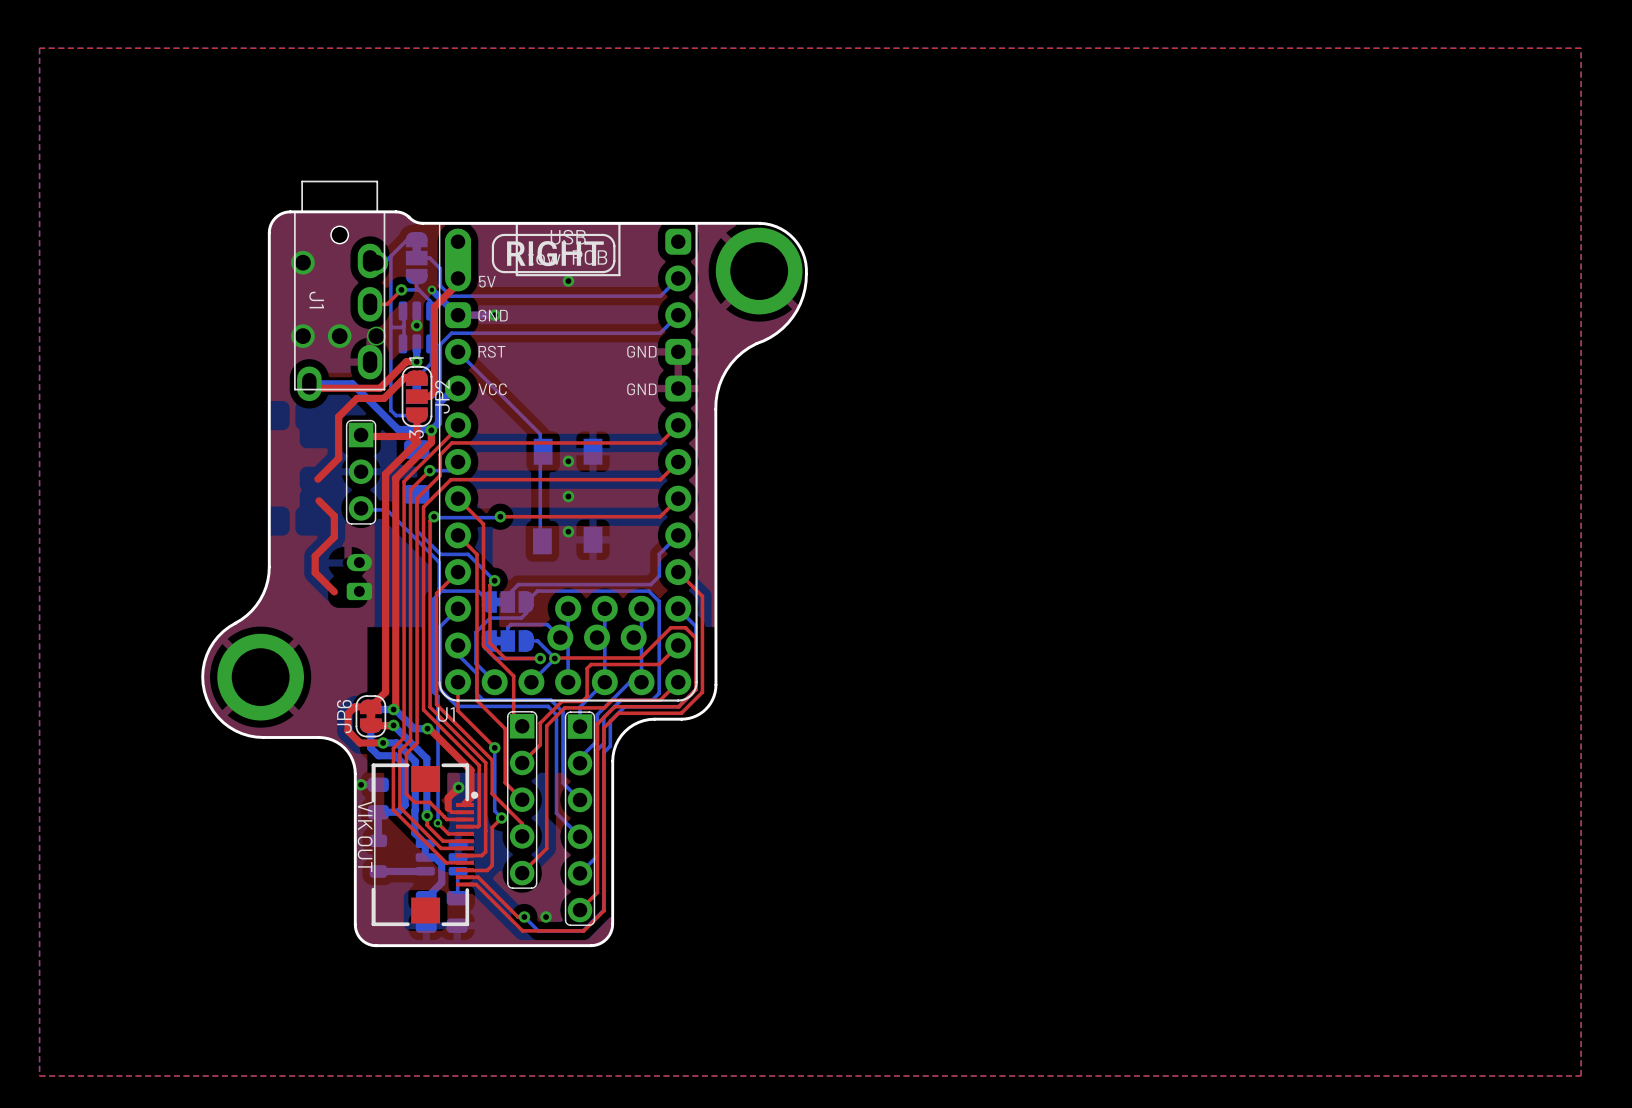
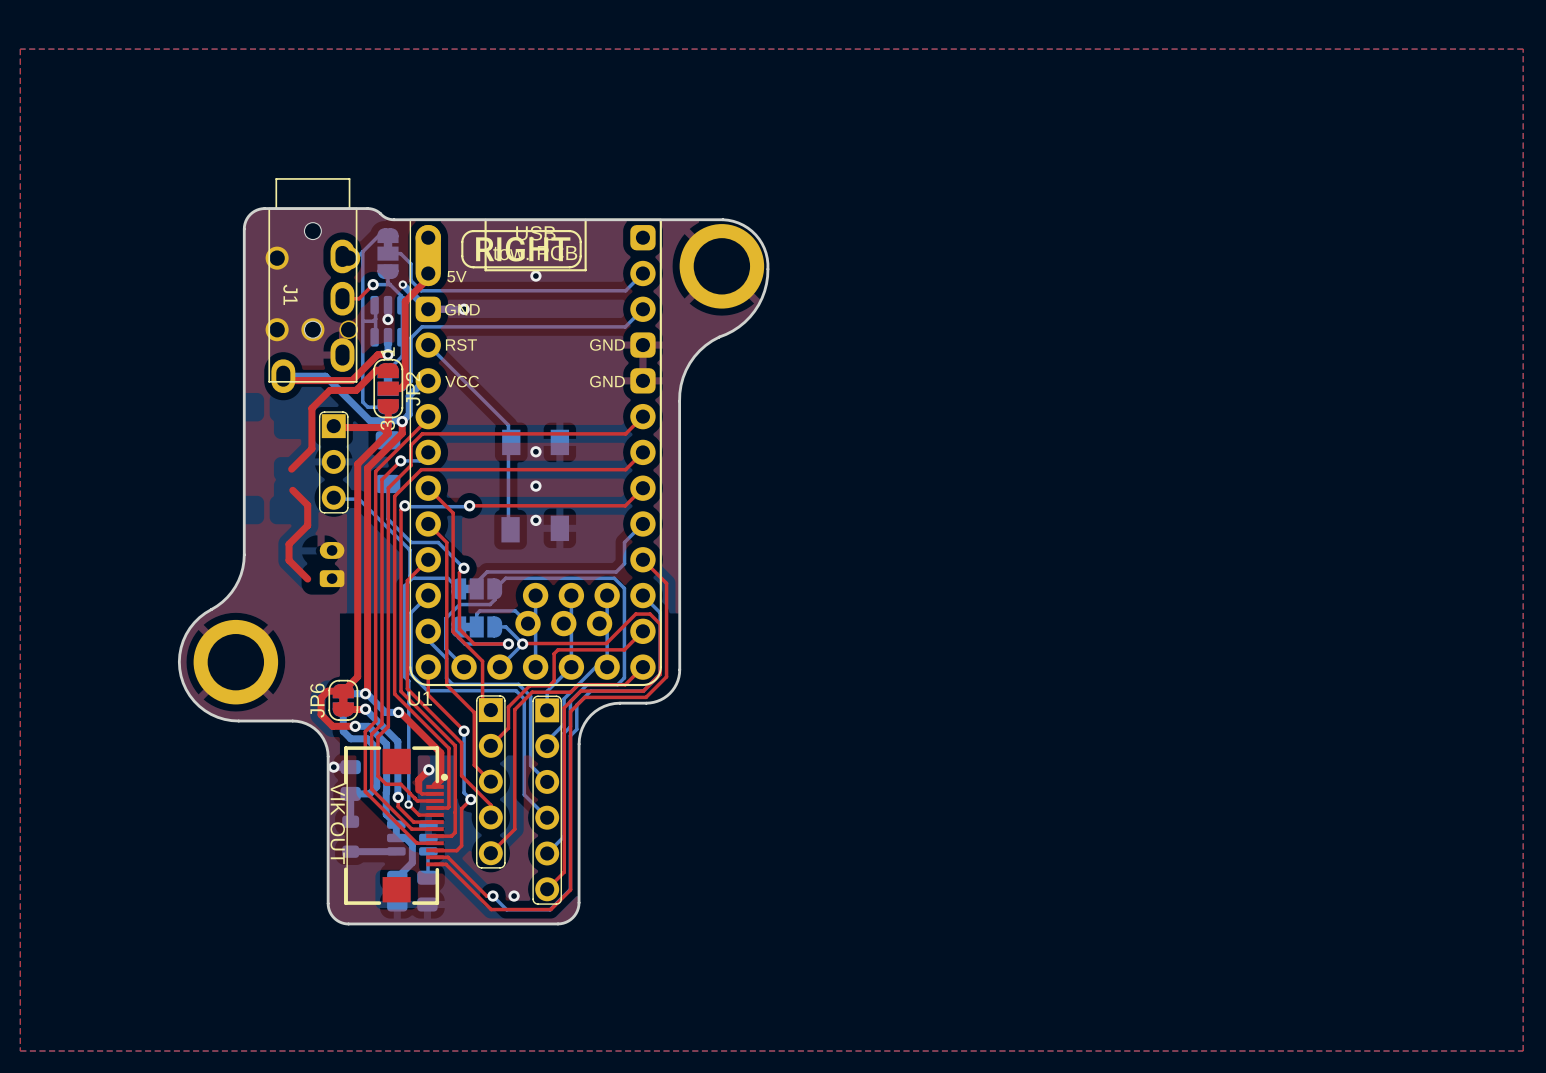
J1 footprint: [294, 180, 386, 402] -> [268, 178, 358, 394]

